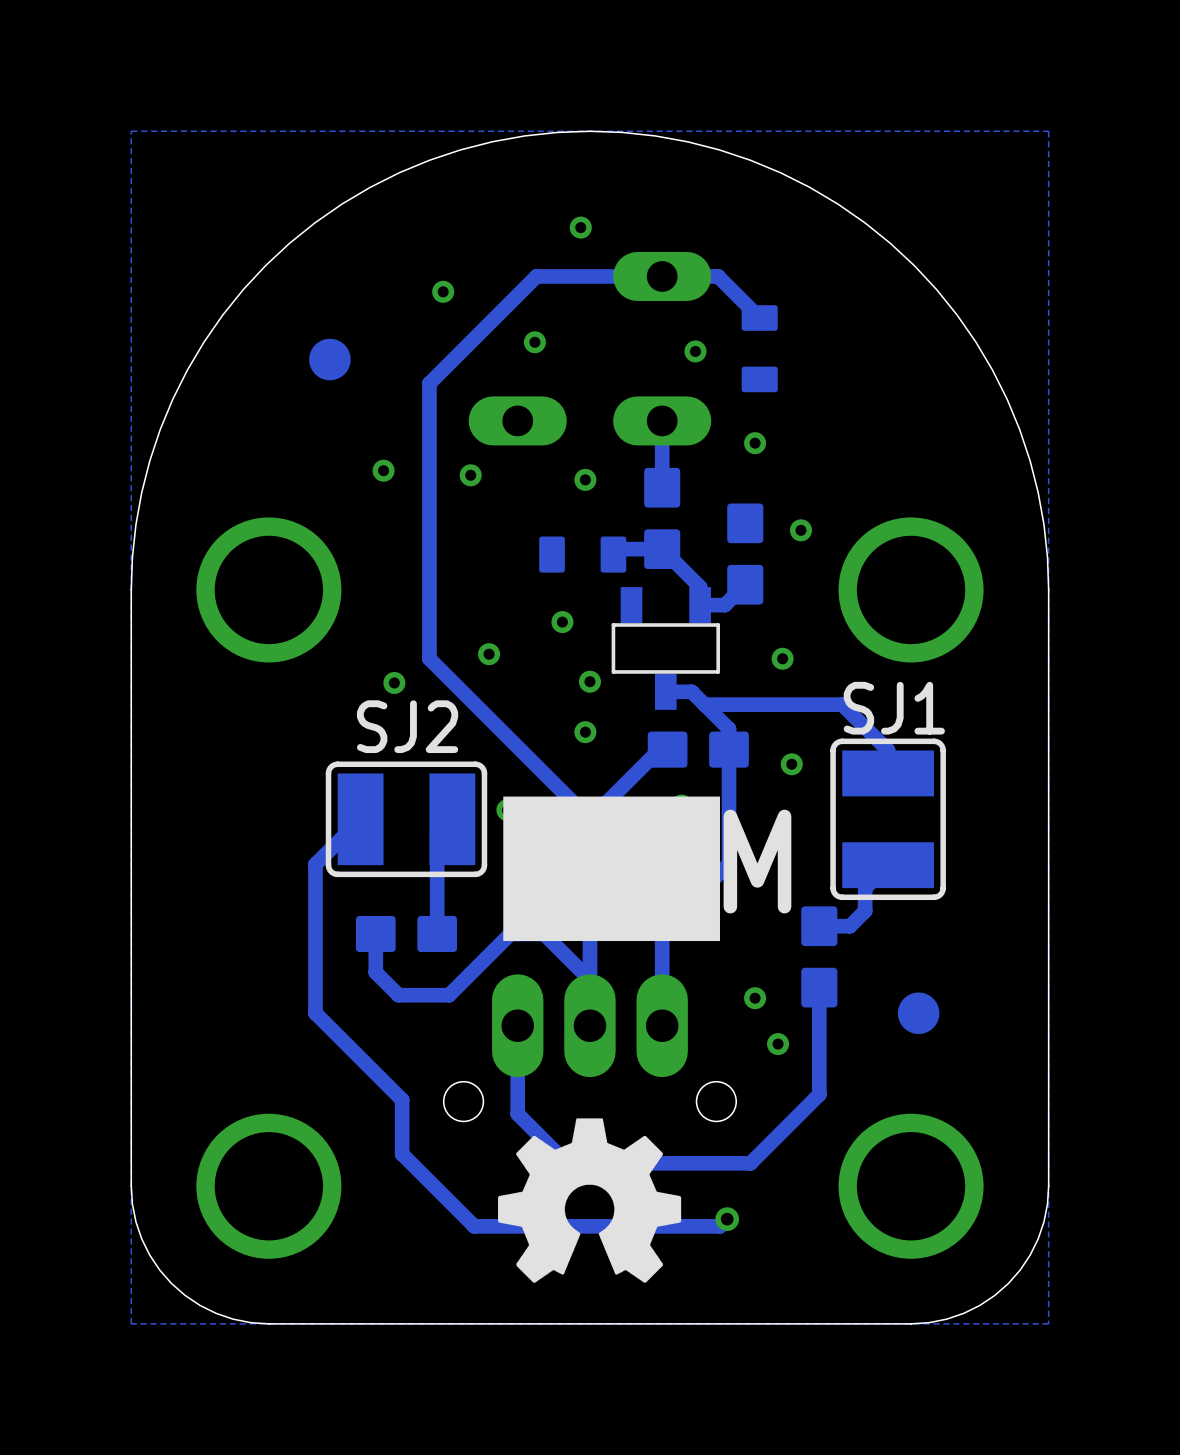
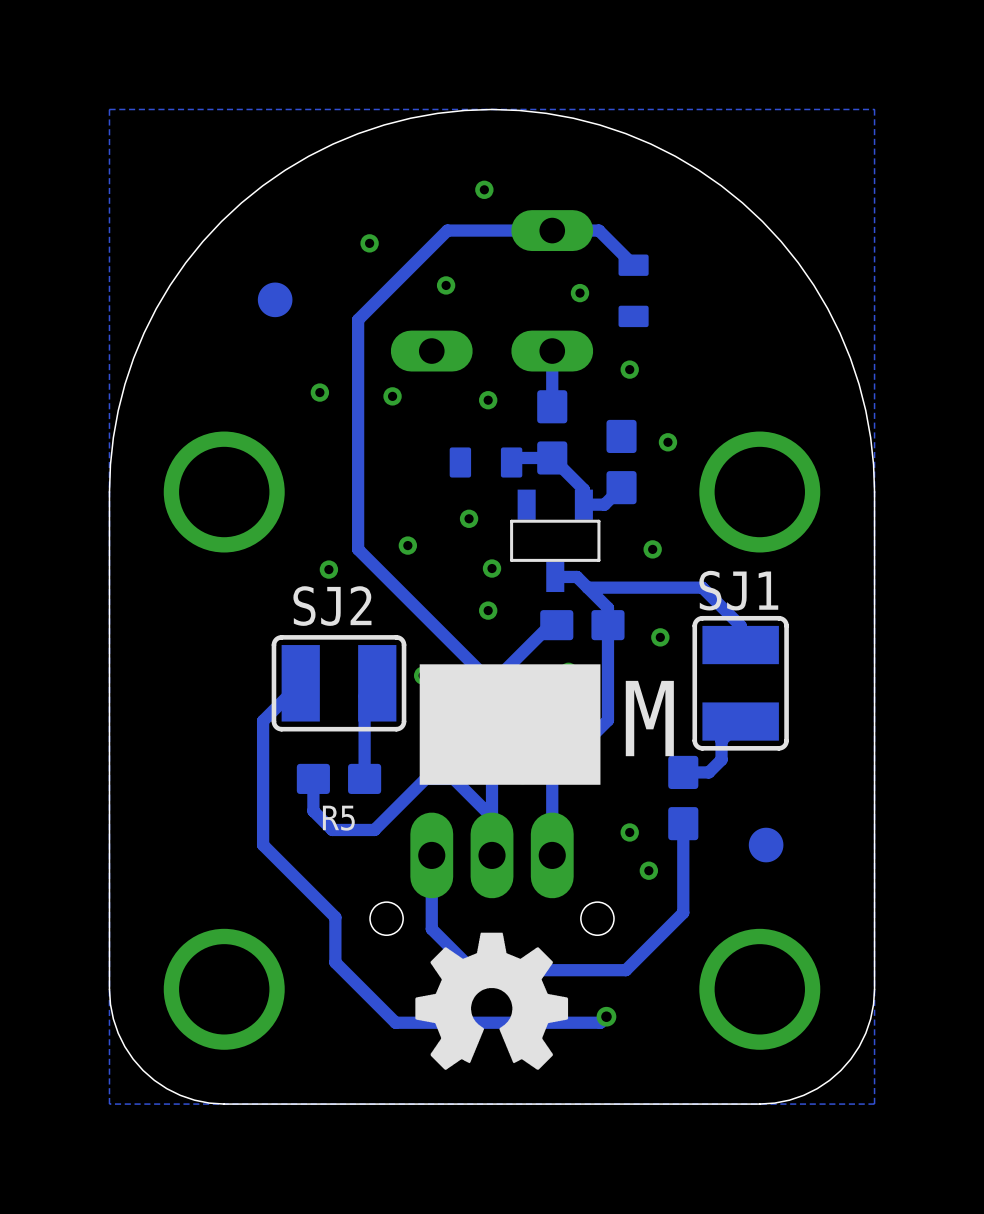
R5 name: none -> R5 (338, 818)

